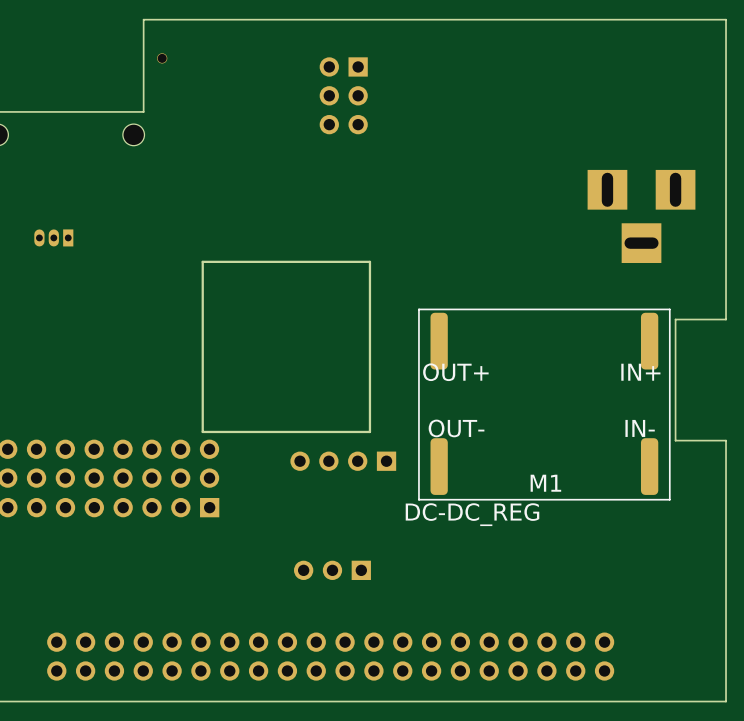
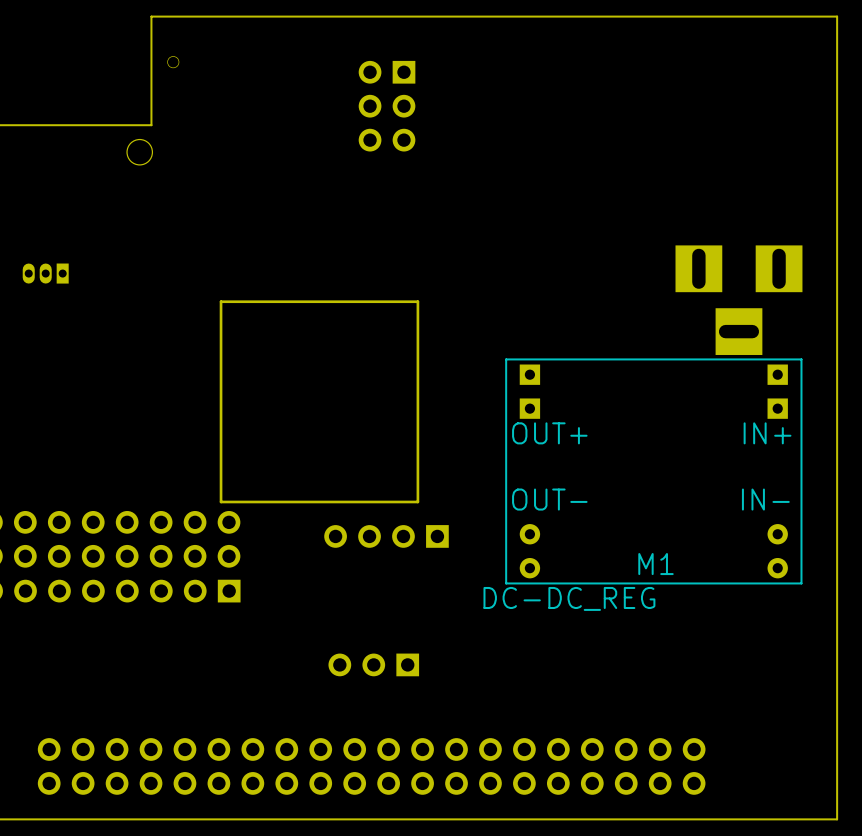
part position: (641, 216) -> (738, 300)
M1 footprint: [418, 308, 671, 501] -> [505, 358, 803, 585]
board edge: (726, 319) (675, 319) (675, 440) (726, 440) -> (837, 369) (837, 512)

